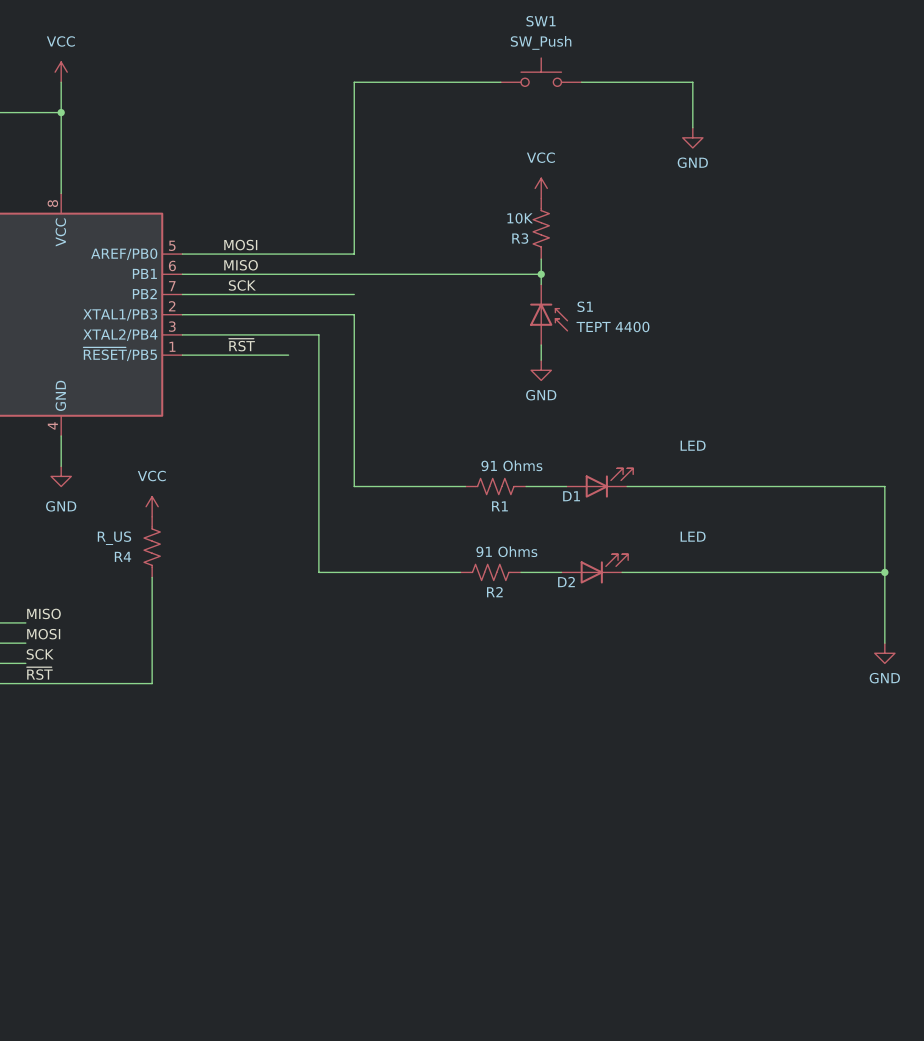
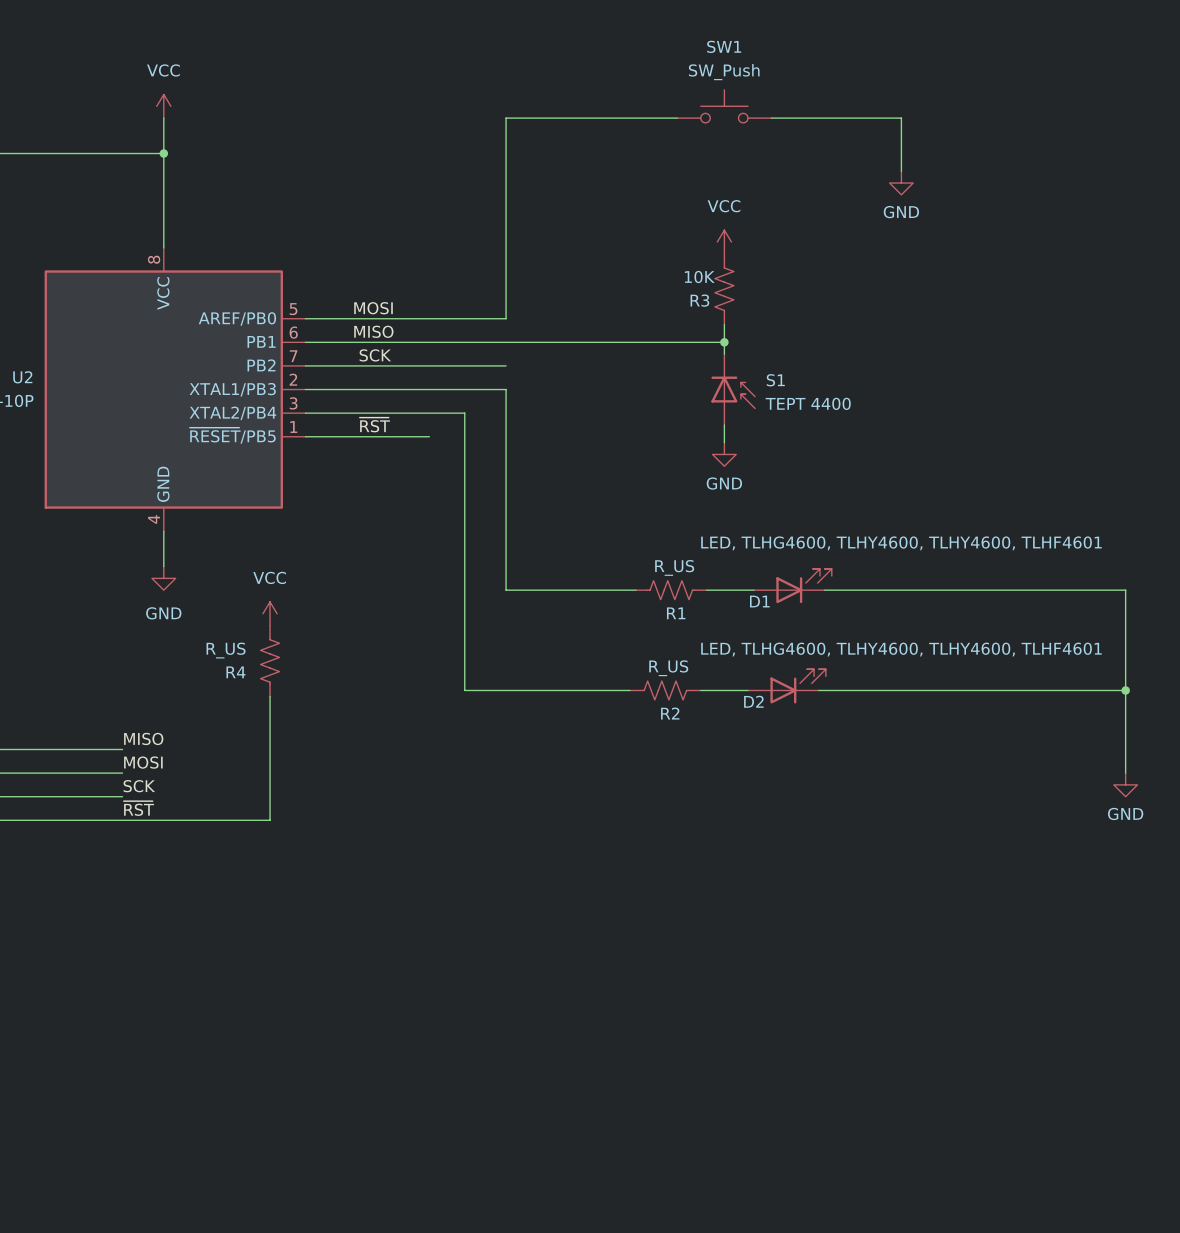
D1 value: LED (693, 445) -> LED, TLHG4600, TLHY4600, TLHY4600, TLHF4601 (901, 543)
R1 value: 91 Ohms (511, 465) -> R_US (674, 567)
D2 value: LED (693, 536) -> LED, TLHG4600, TLHY4600, TLHY4600, TLHF4601 (901, 649)
R2 value: 91 Ohms (506, 551) -> R_US (668, 668)

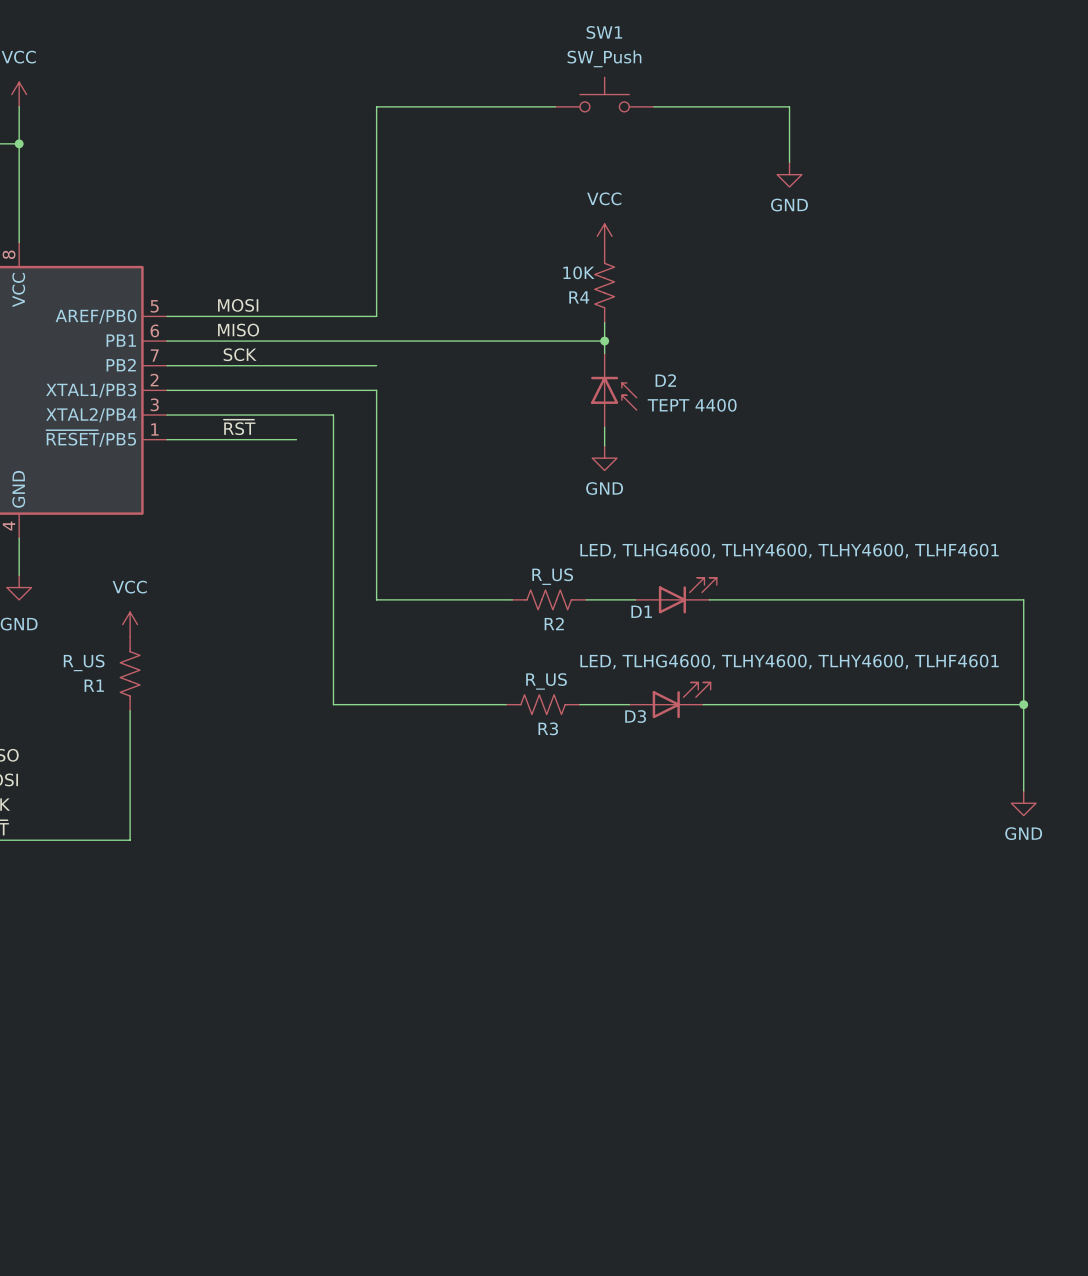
R3 name: R3 (699, 300) -> R4 (579, 297)
S1 name: S1 (775, 380) -> D2 (665, 380)
R1 name: R1 (676, 613) -> R2 (554, 623)
R4 name: R4 (235, 672) -> R1 (94, 685)
D2 name: D2 (753, 701) -> D3 (635, 716)
R2 name: R2 (670, 713) -> R3 (548, 728)

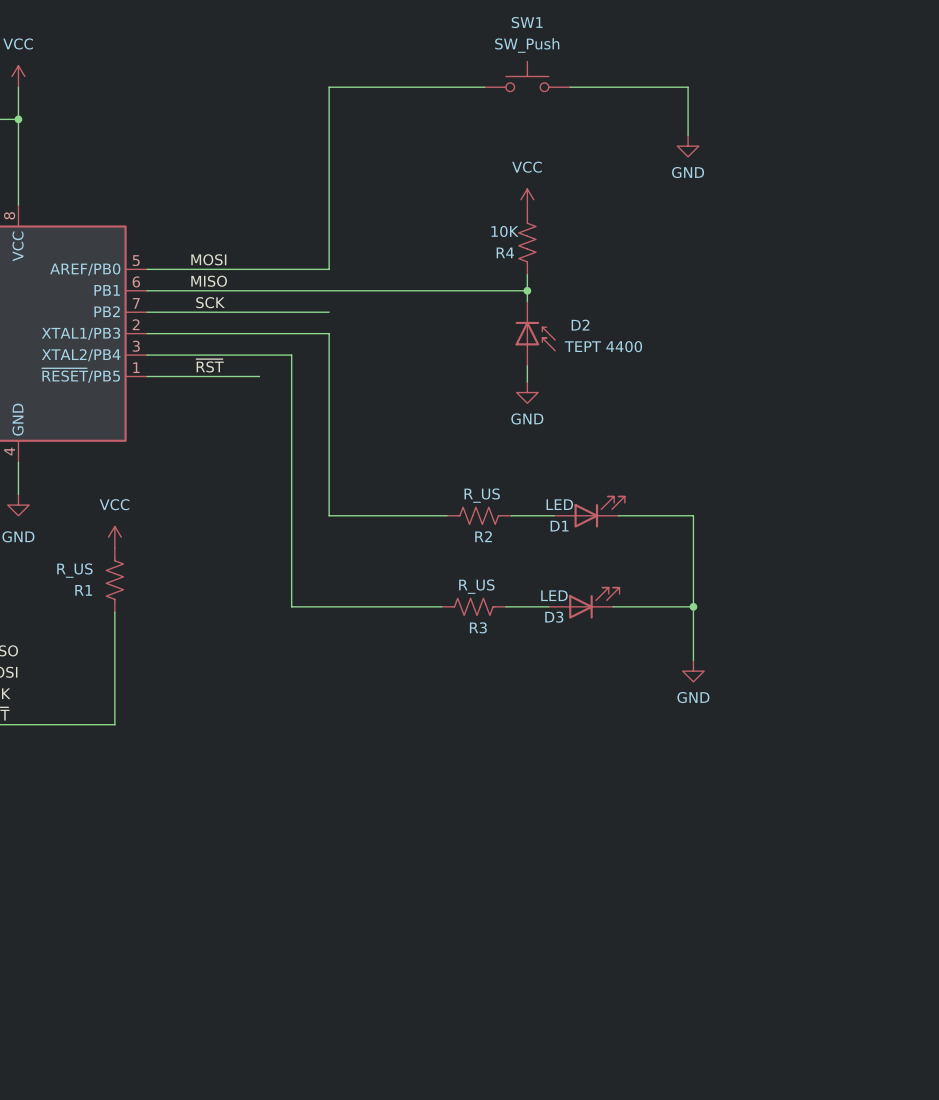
D1 value: LED, TLHG4600, TLHY4600, TLHY4600, TLHF4601 (789, 551) -> LED (559, 504)
wire: (795, 599) (1023, 599) (1023, 790) -> (693, 515) (693, 660)
D3 value: LED, TLHG4600, TLHY4600, TLHY4600, TLHF4601 (789, 661) -> LED (554, 595)
wire: (795, 704) (1023, 704) -> none
junction: none -> (693, 606)
junction: (1023, 704) -> none
power symbol position: GND (1023, 803) -> GND (693, 671)

